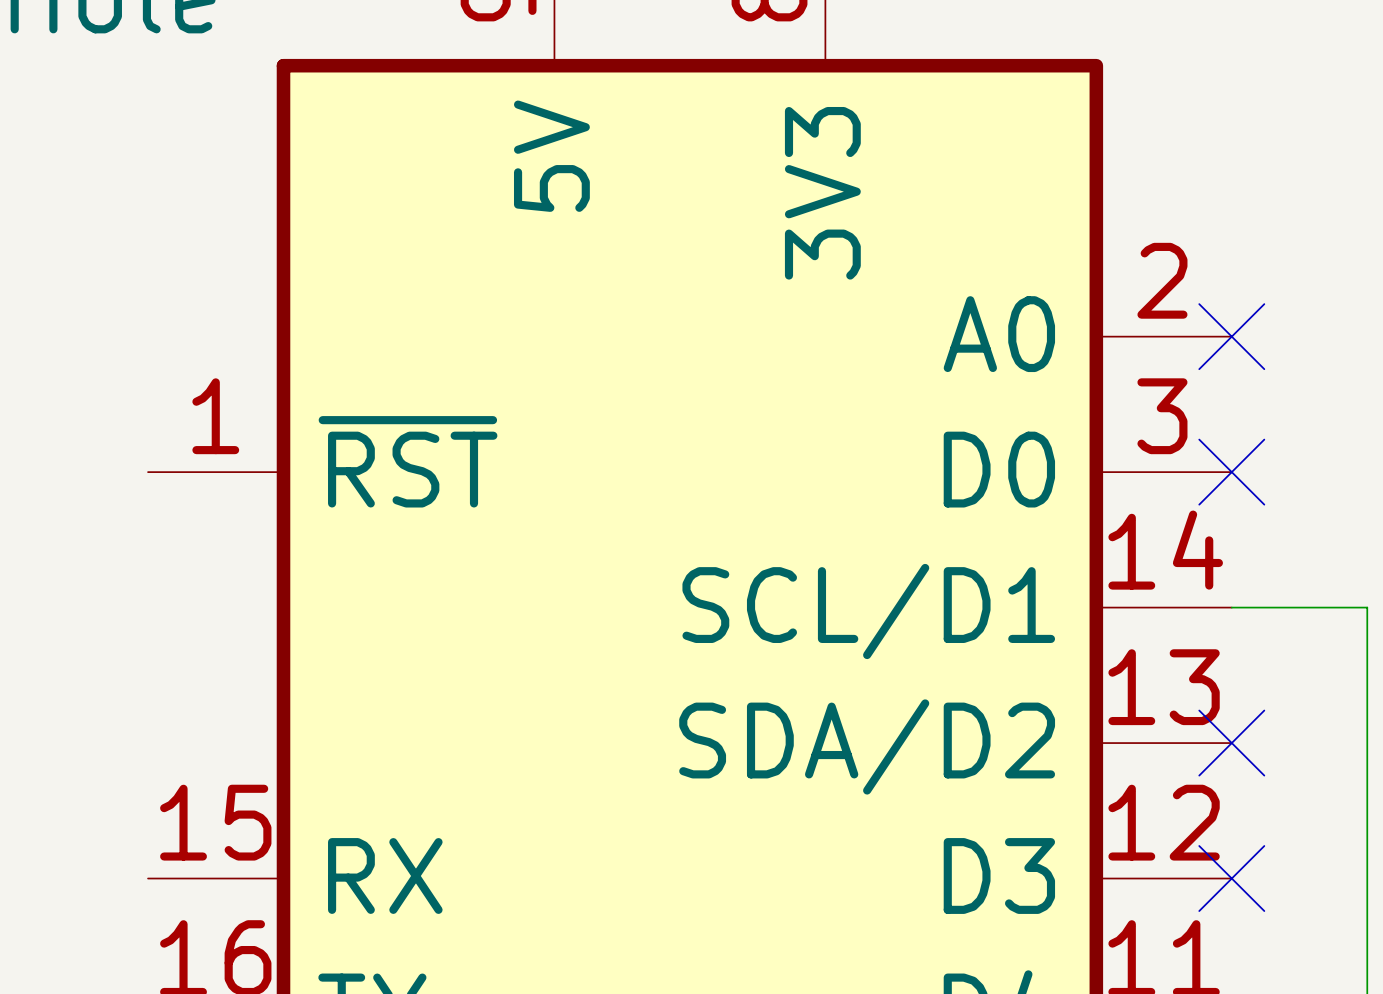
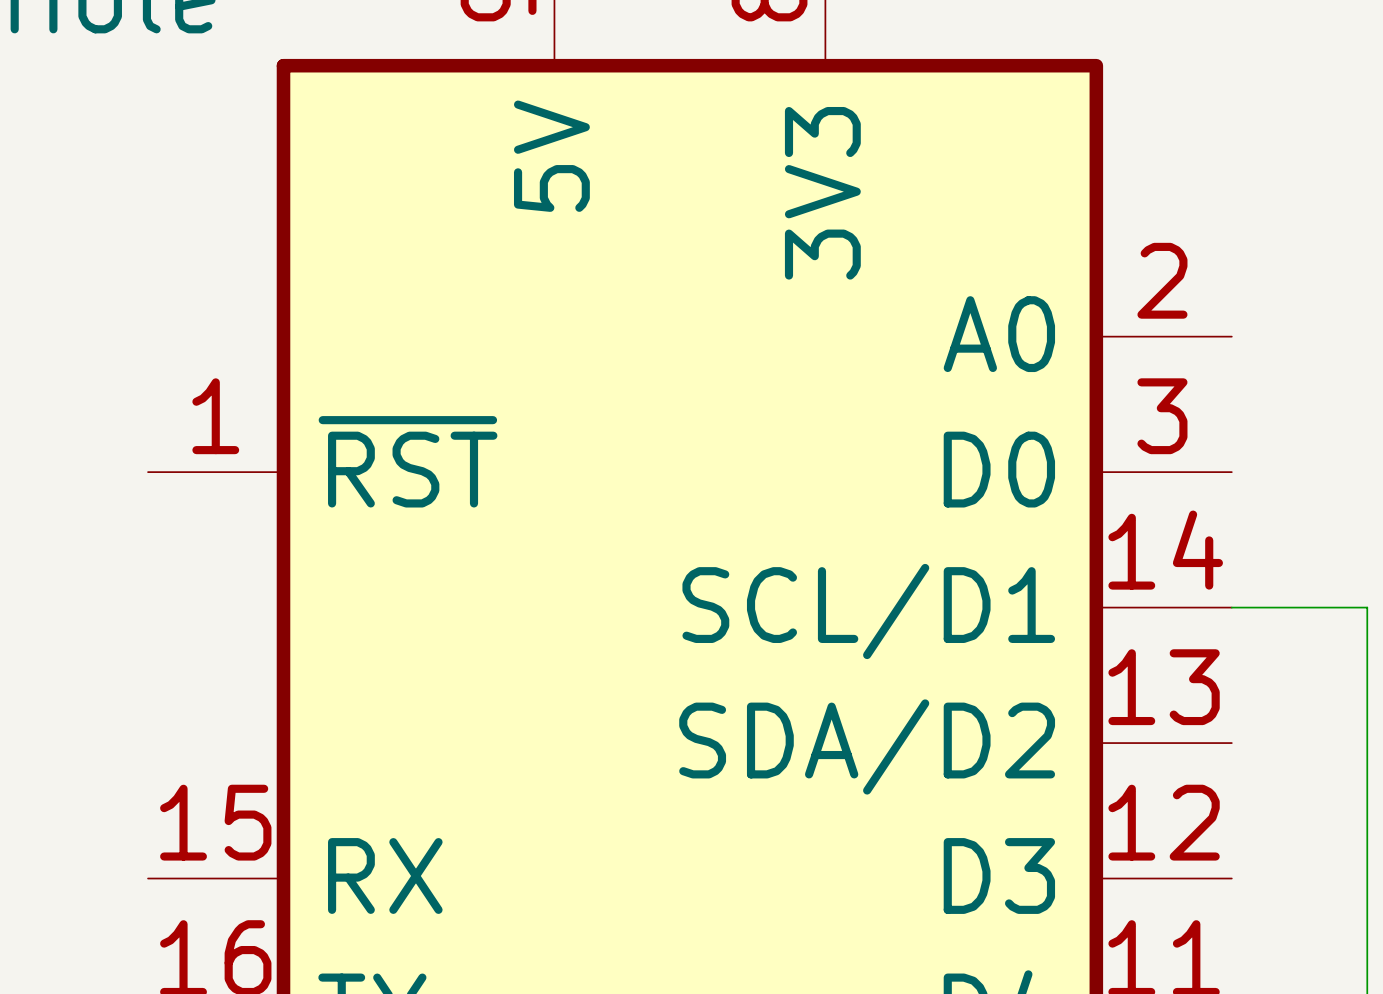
no-connect mark: (1231, 336) -> none
no-connect mark: (1231, 472) -> none
no-connect mark: (1231, 743) -> none
no-connect mark: (1231, 878) -> none

